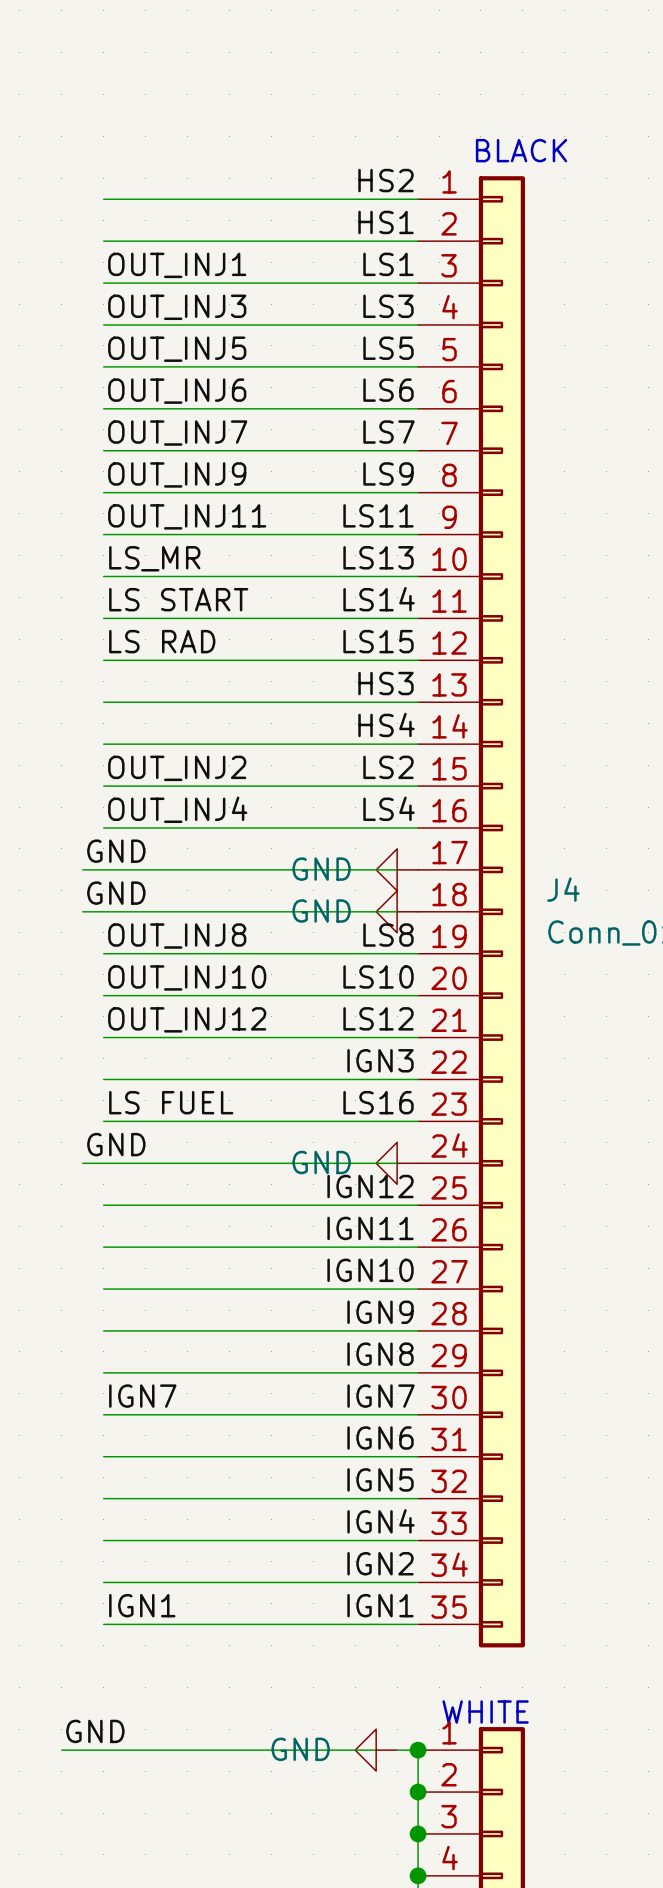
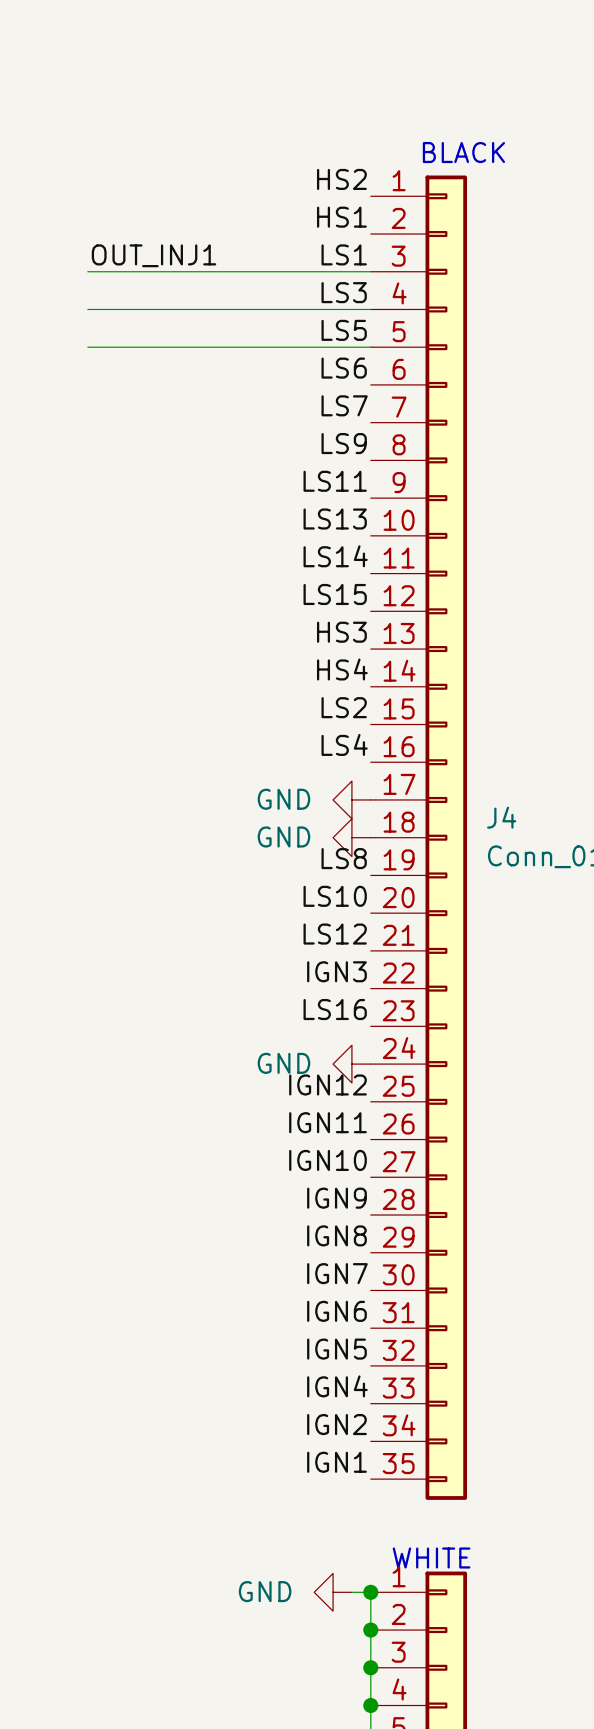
wire: (103, 199) (418, 199) -> none
wire: (103, 241) (418, 241) -> none
label: OUT_INJ3 (177, 307) -> none
label: OUT_INJ5 (177, 349) -> none
label: OUT_INJ6 (177, 391) -> none
wire: (103, 408) (418, 408) -> none
label: OUT_INJ7 (177, 433) -> none
wire: (103, 450) (418, 450) -> none
label: OUT_INJ9 (177, 474) -> none
wire: (103, 492) (418, 492) -> none
label: OUT_INJ11 (187, 516) -> none
wire: (103, 534) (418, 534) -> none
label: LS_MR (154, 558) -> none
wire: (103, 576) (418, 576) -> none
label: LS START (178, 599) -> none
wire: (103, 618) (418, 618) -> none
label: LS RAD (162, 641) -> none
wire: (103, 660) (418, 660) -> none
wire: (103, 702) (418, 702) -> none
wire: (103, 744) (418, 744) -> none
label: OUT_INJ2 (177, 768) -> none
wire: (103, 786) (418, 786) -> none
label: OUT_INJ4 (177, 809) -> none
wire: (103, 827) (418, 827) -> none
label: GND (116, 851) -> none
wire: (82, 869) (397, 869) -> none
label: GND (116, 893) -> none
wire: (82, 911) (397, 911) -> none
label: OUT_INJ8 (177, 936) -> none
wire: (103, 953) (418, 953) -> none
label: OUT_INJ10 (187, 977) -> none
wire: (103, 995) (418, 995) -> none
label: OUT_INJ12 (187, 1019) -> none
wire: (103, 1037) (418, 1037) -> none
wire: (103, 1079) (418, 1079) -> none
label: LS FUEL (171, 1102) -> none
wire: (103, 1121) (418, 1121) -> none
label: GND (116, 1144) -> none
wire: (82, 1163) (397, 1163) -> none
wire: (103, 1205) (418, 1205) -> none
wire: (103, 1247) (418, 1247) -> none
wire: (103, 1289) (418, 1289) -> none
wire: (103, 1330) (418, 1330) -> none
wire: (103, 1372) (418, 1372) -> none
label: IGN7 (142, 1396) -> none
wire: (103, 1414) (418, 1414) -> none
wire: (103, 1456) (418, 1456) -> none
wire: (103, 1498) (418, 1498) -> none
wire: (103, 1540) (417, 1540) -> none
wire: (103, 1582) (417, 1582) -> none
label: IGN1 (142, 1605) -> none
wire: (103, 1624) (417, 1624) -> none
label: GND (95, 1731) -> none
wire: (61, 1750) (375, 1750) -> none

